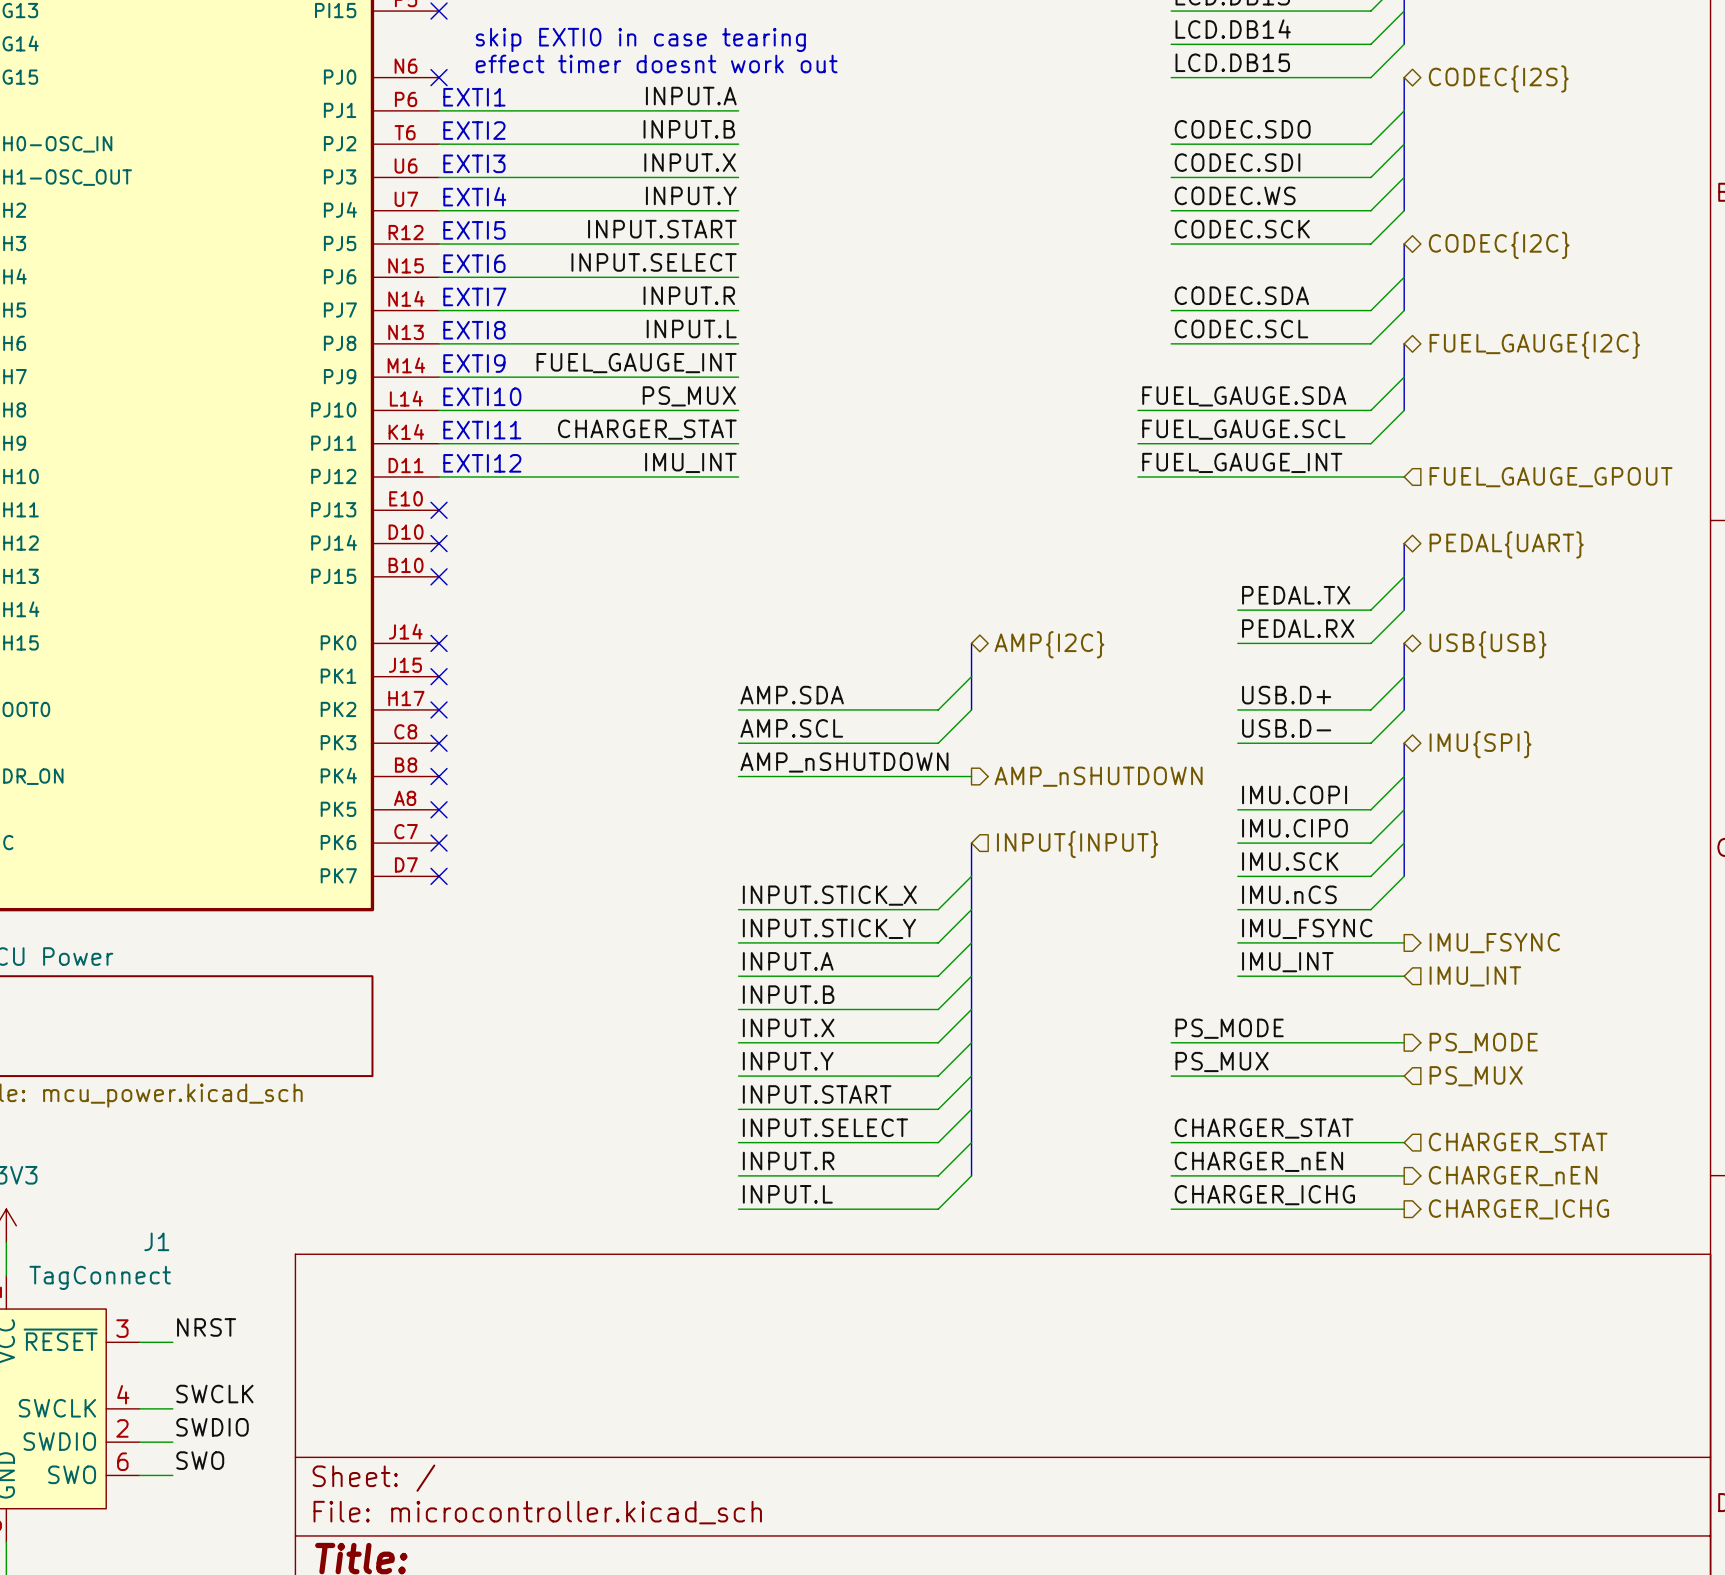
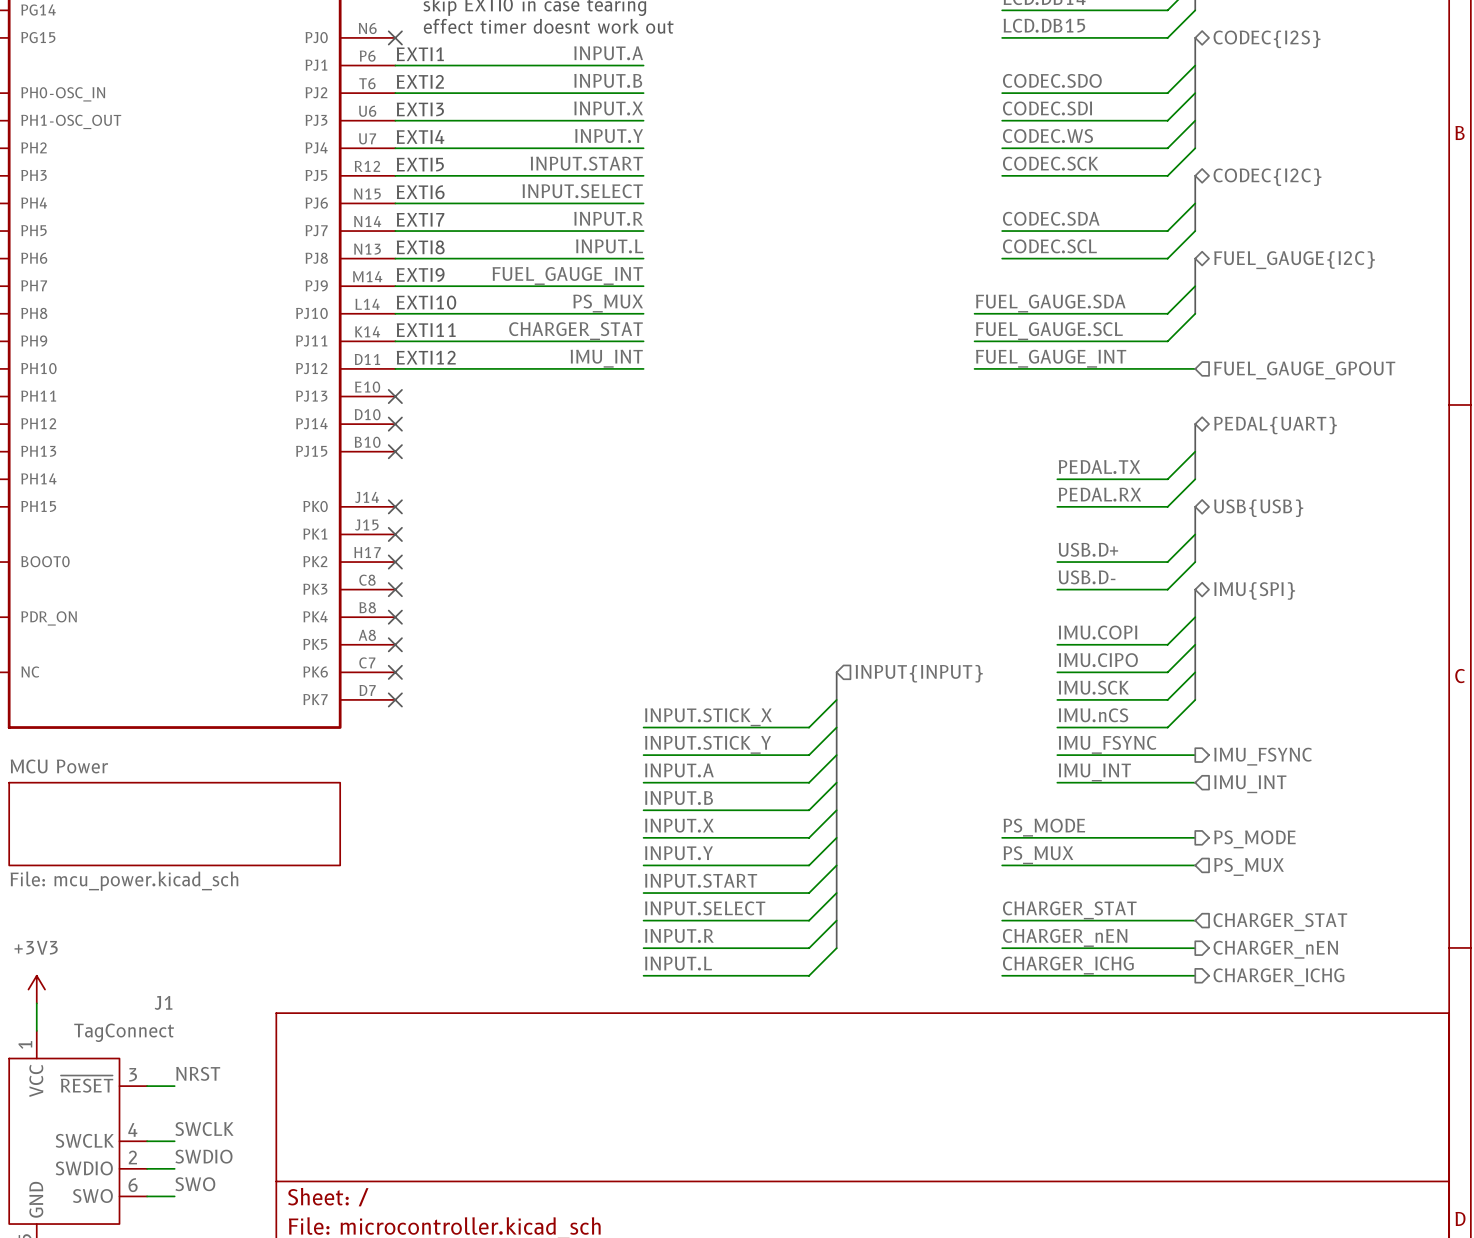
bus: (971, 643) (971, 709) -> none
hierarchical label: AMP{I2C} (1049, 644) -> none
wire: (971, 676) (938, 709) (738, 709) -> none
label: AMP.SDA (792, 695) -> none
wire: (971, 709) (938, 743) (738, 743) -> none
label: AMP.SCL (791, 728) -> none
label: AMP_nSHUTDOWN (844, 762) -> none
wire: (738, 776) (971, 776) -> none
hierarchical label: AMP_nSHUTDOWN (1098, 776) -> none

